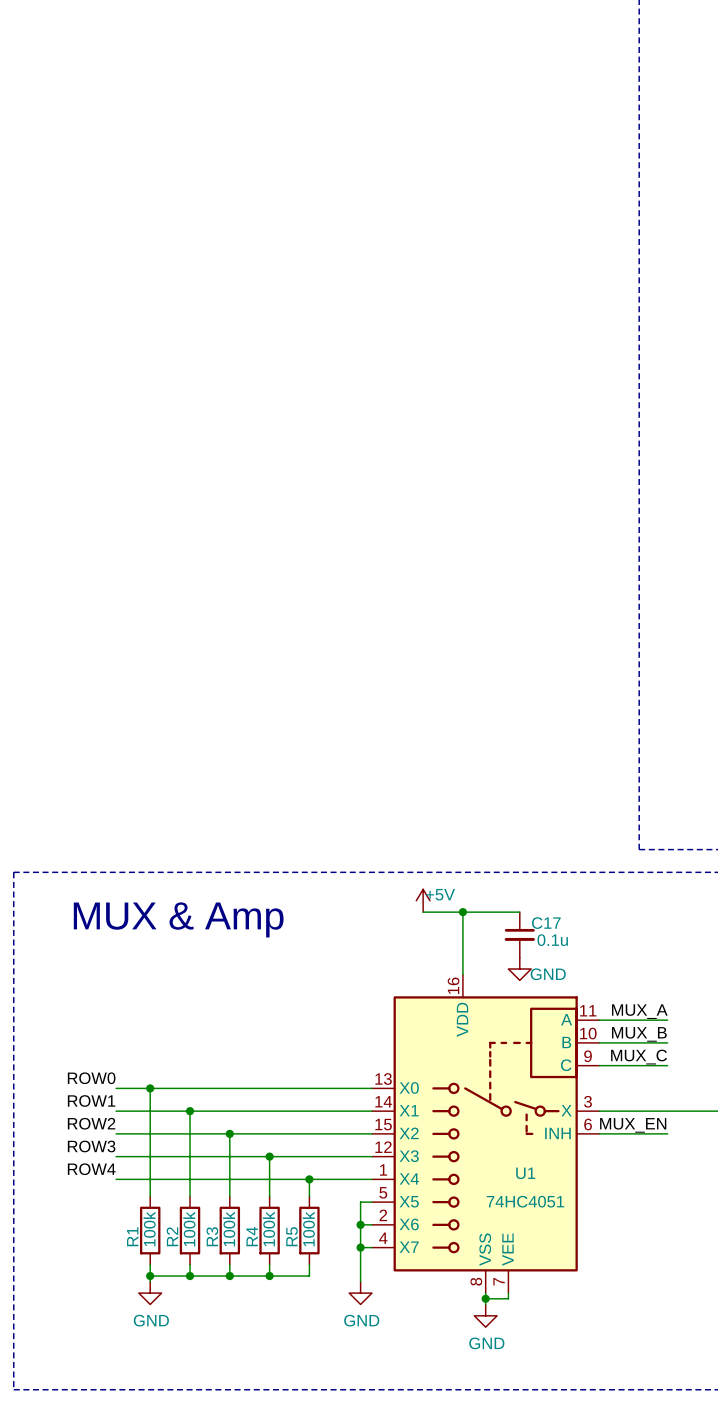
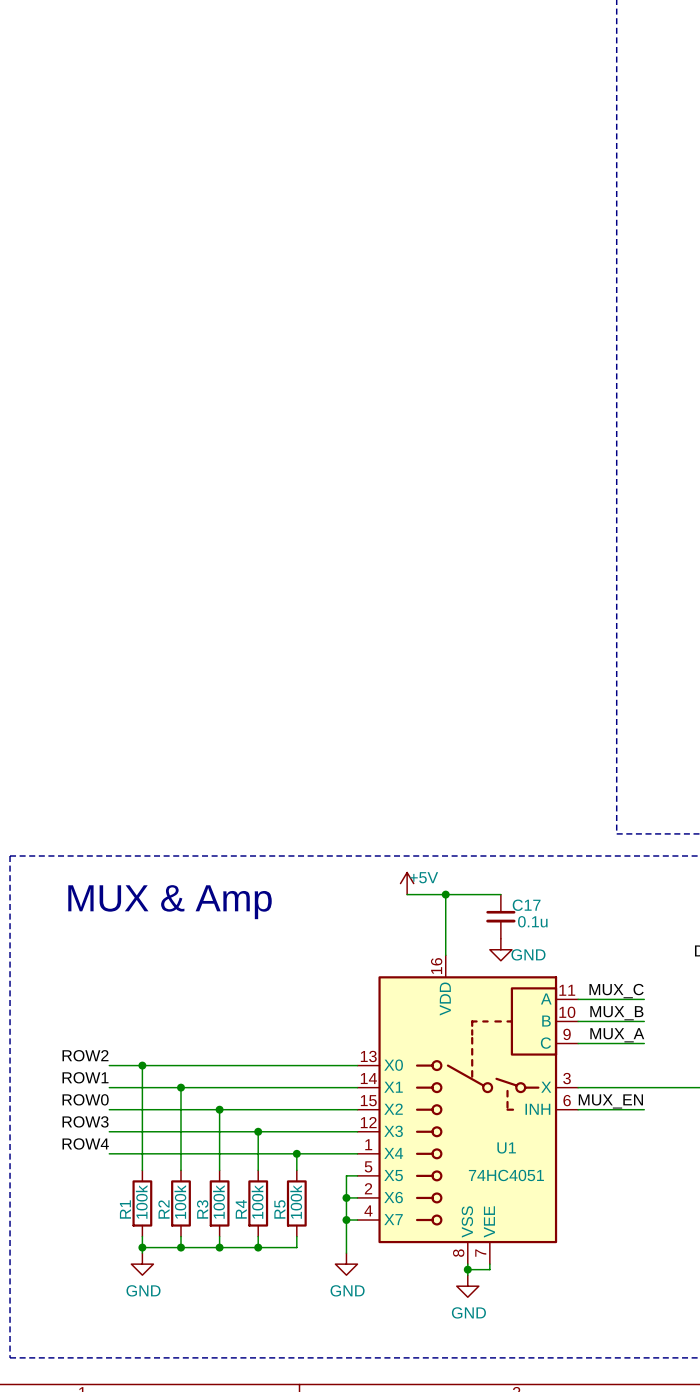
label: MUX_A (639, 1011) -> MUX_C (616, 991)
label: MUX_C (639, 1057) -> MUX_A (617, 1035)
label: ROW0 (91, 1078) -> ROW2 (85, 1055)
label: ROW2 (91, 1123) -> ROW0 (85, 1099)

